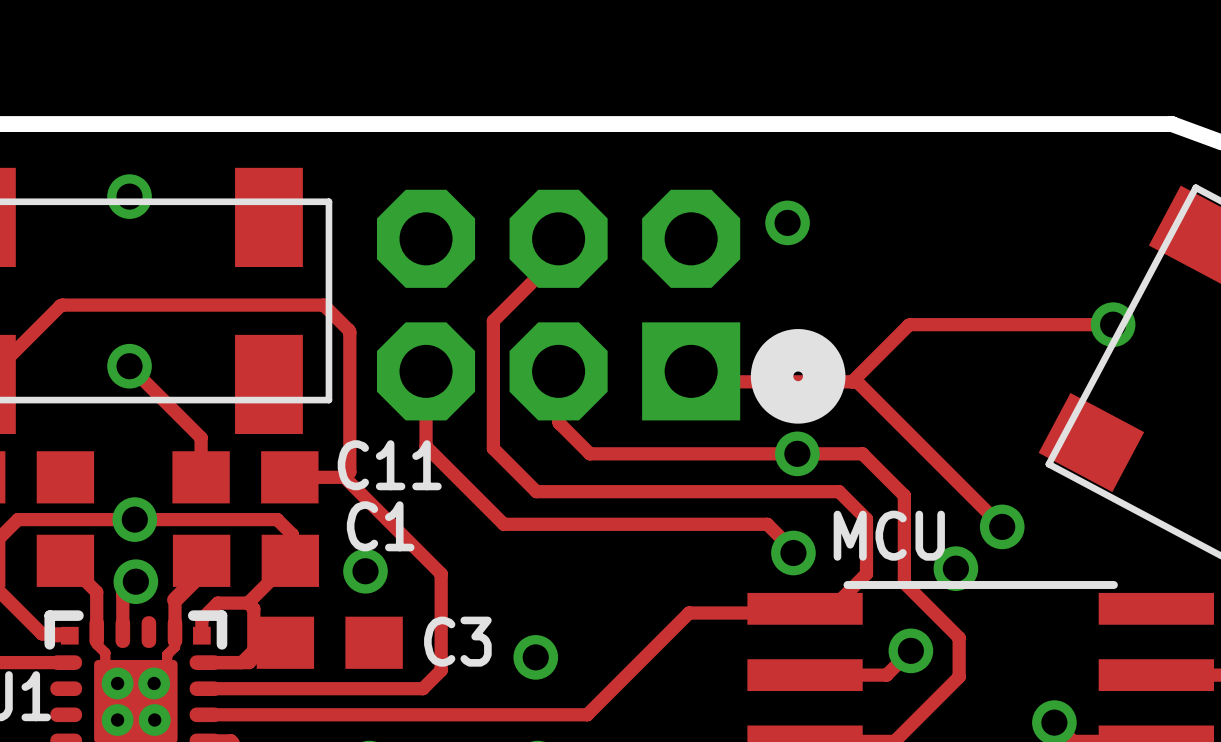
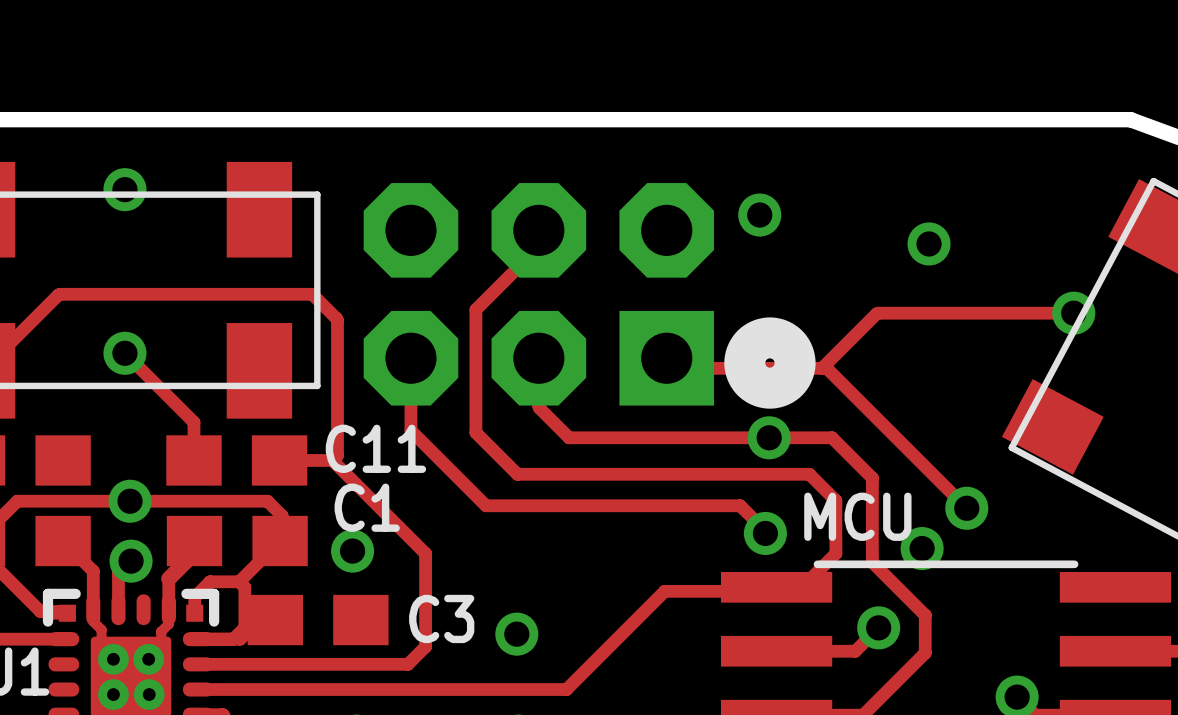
via: none -> (929, 243)

